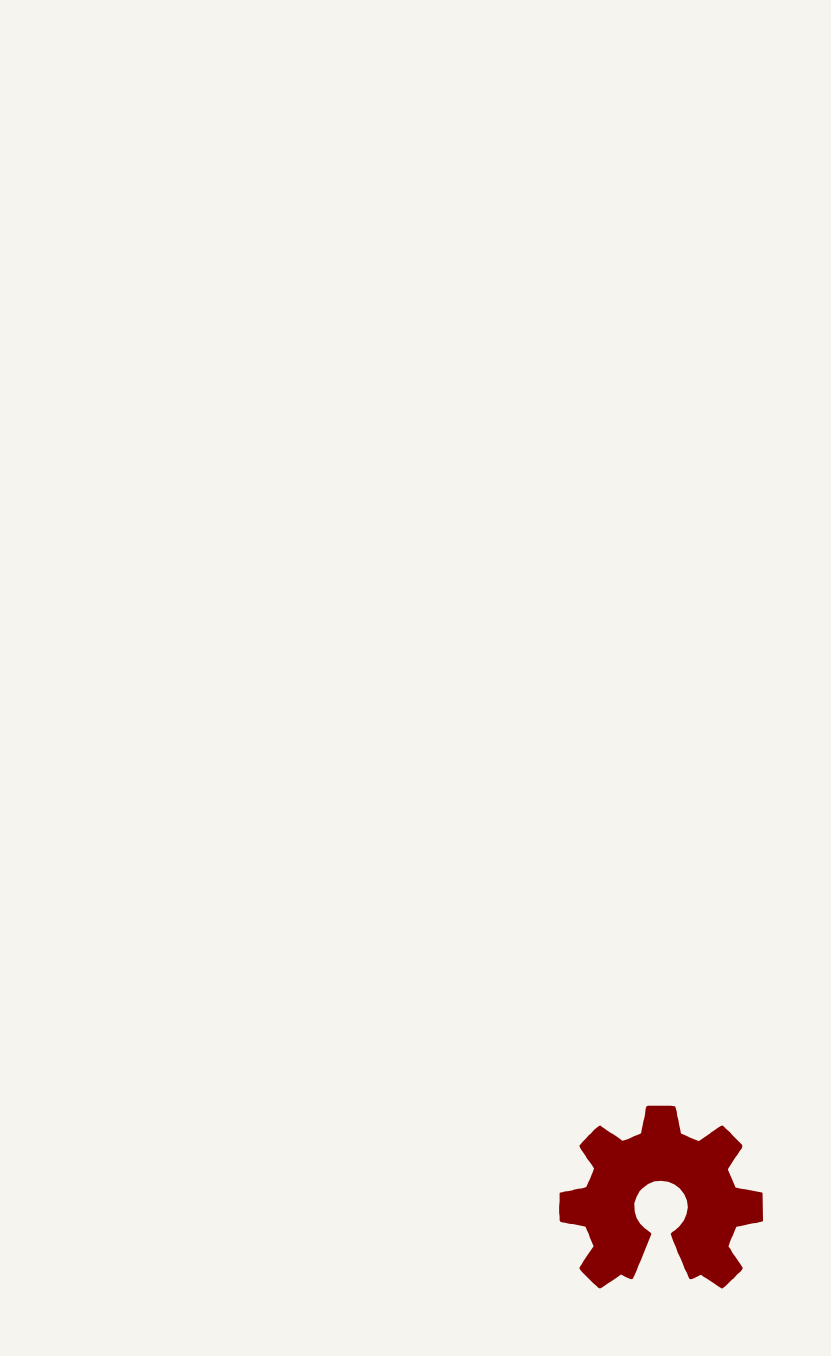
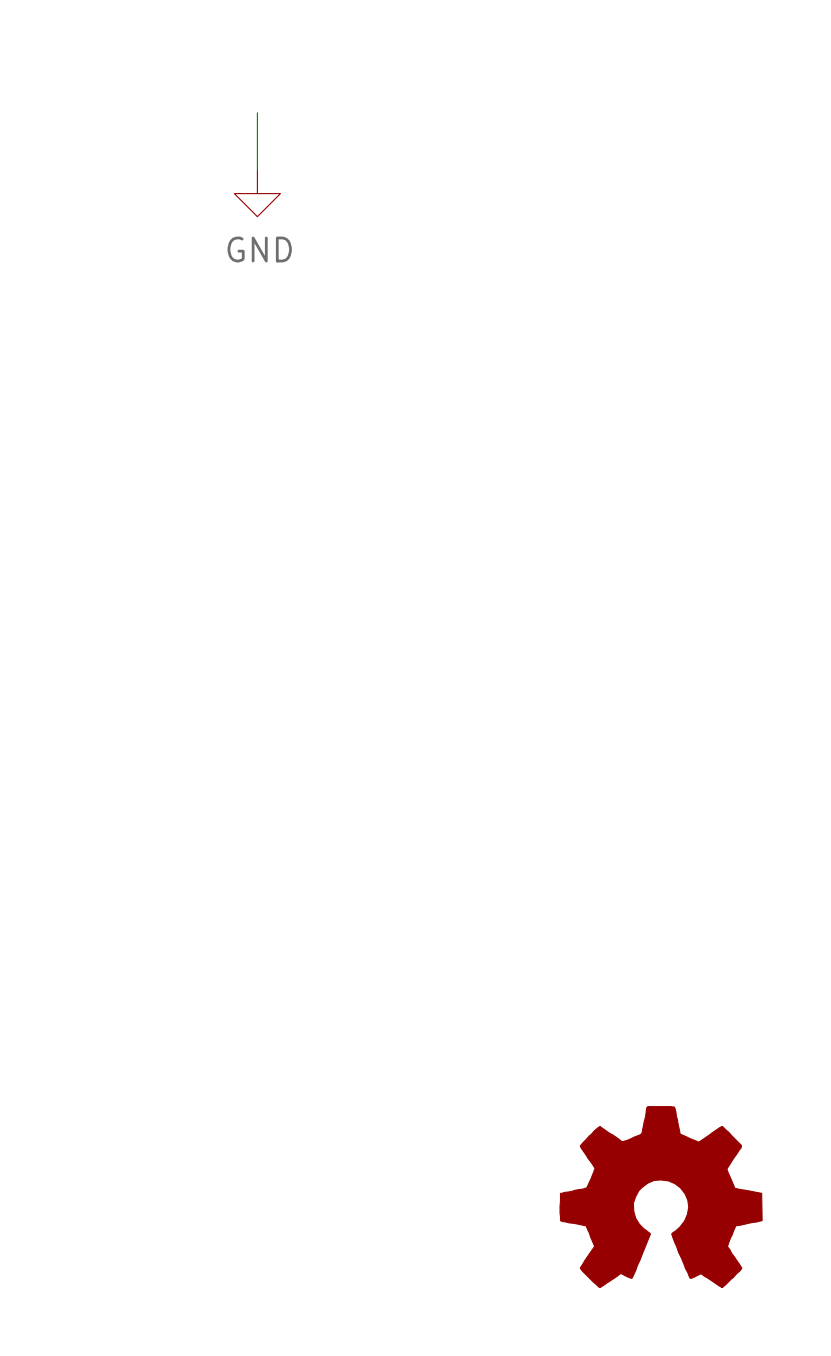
wire: none -> (257, 112) (257, 170)
power symbol: none -> GND (257, 193)

